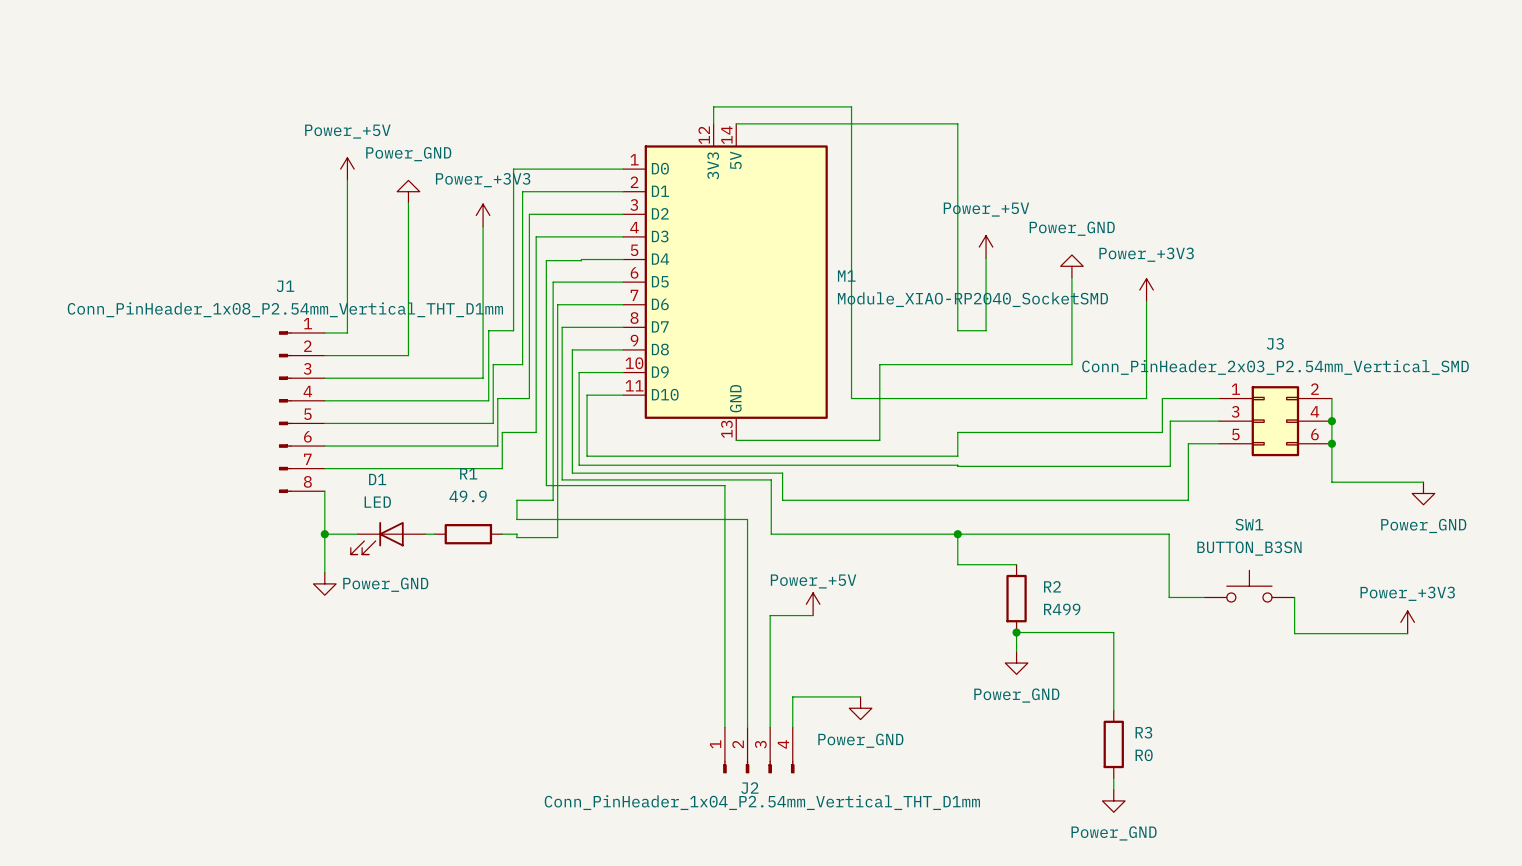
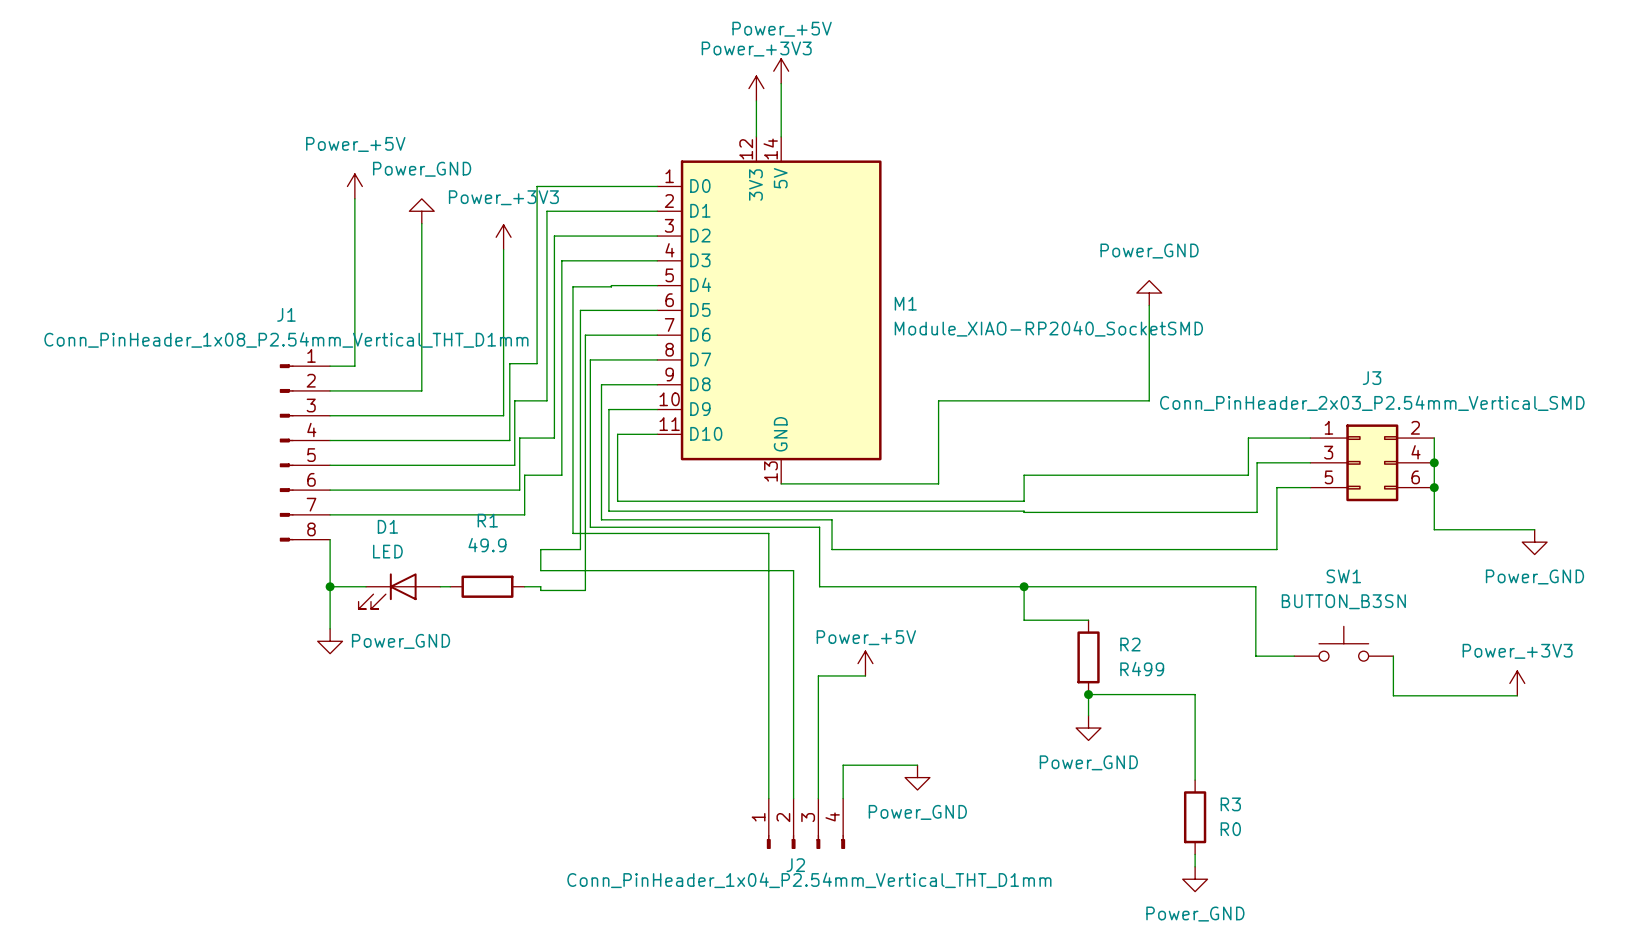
power symbol: none -> Power_+5V (781, 71)
power symbol: none -> Power_+3V3 (756, 88)
wire: (713, 106) (851, 106) (851, 398) (1146, 398) (1146, 301) -> (756, 118) (756, 100)
wire: (736, 123) (957, 123) (957, 330) (986, 330) (986, 258) -> (781, 136) (781, 83)
power symbol: Power_+5V (986, 247) -> none
power symbol: Power_+3V3 (1146, 290) -> none

